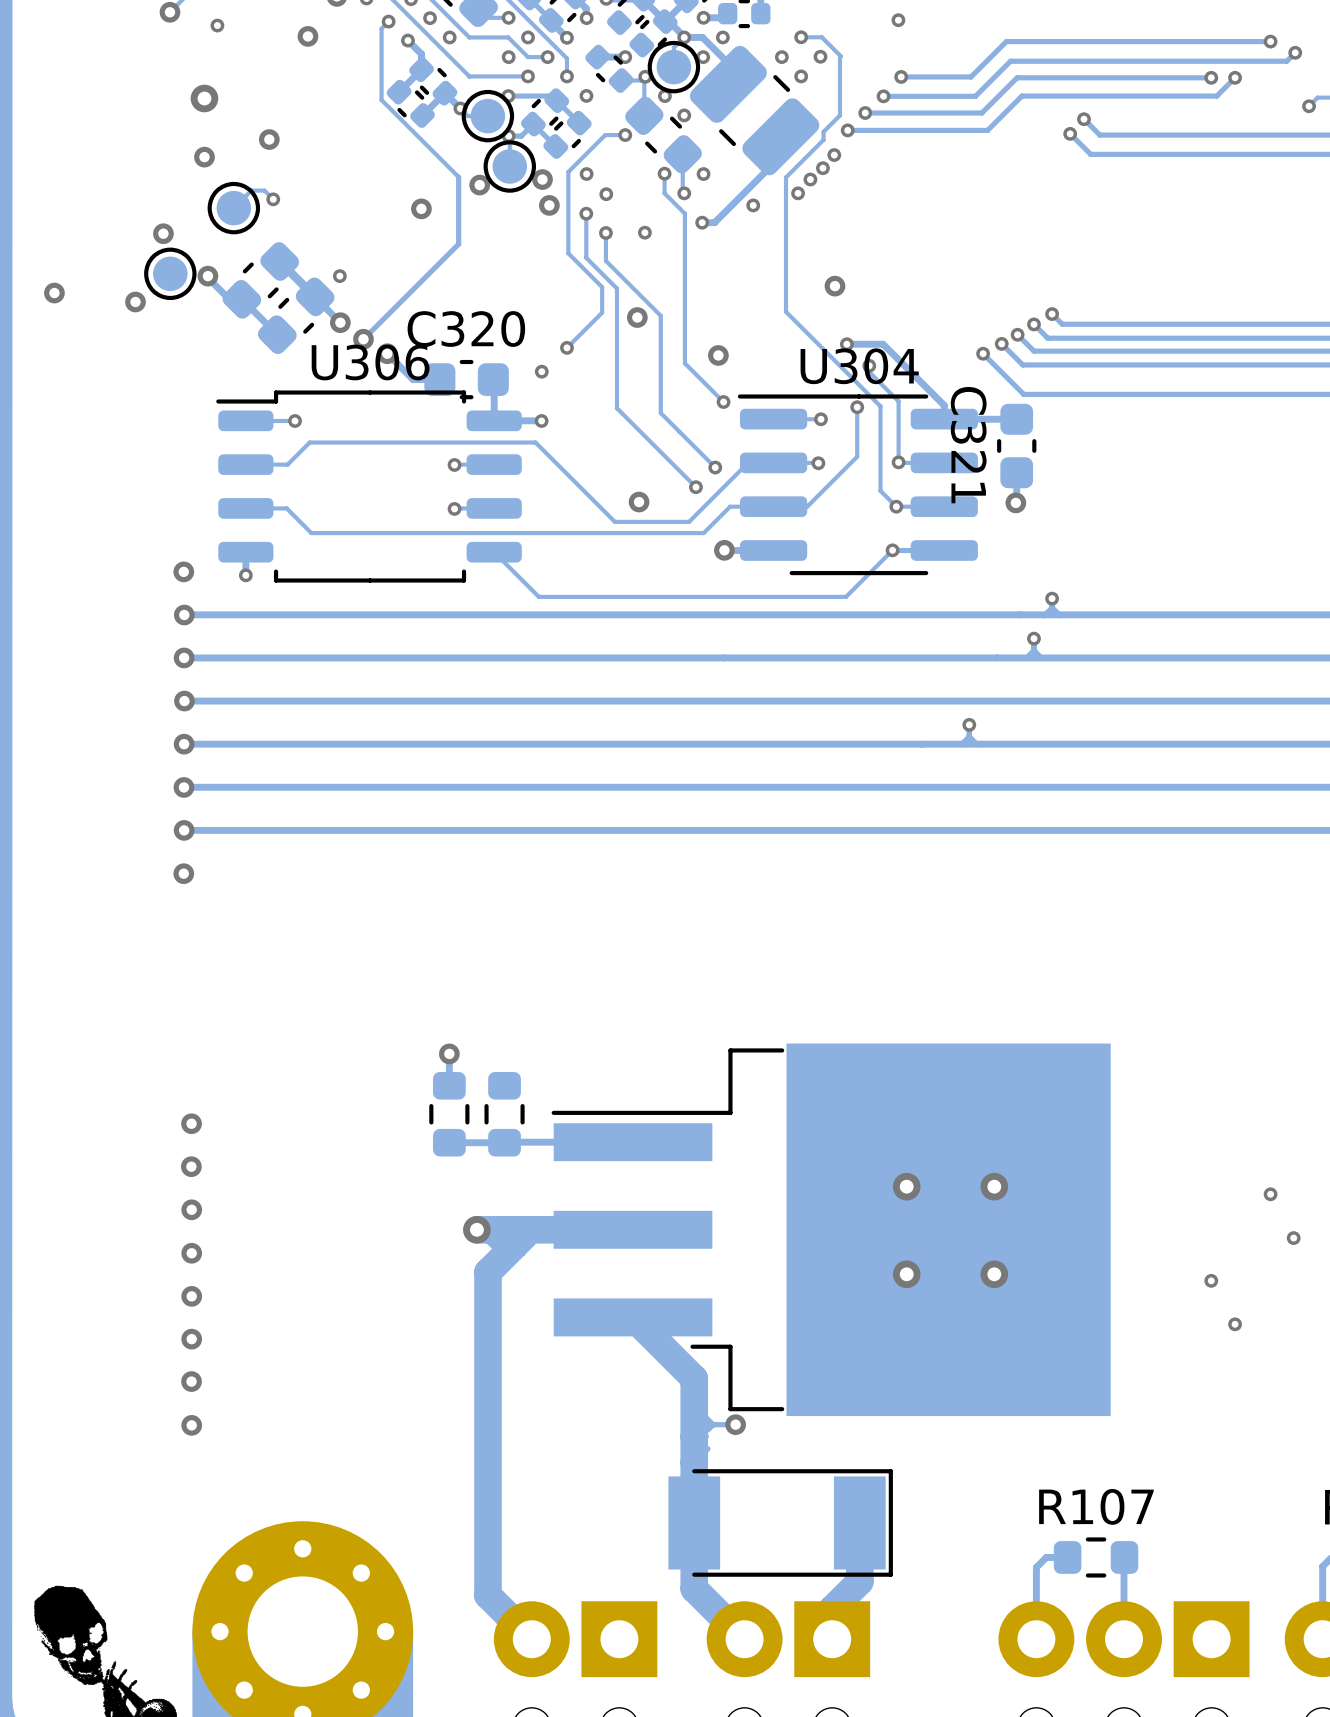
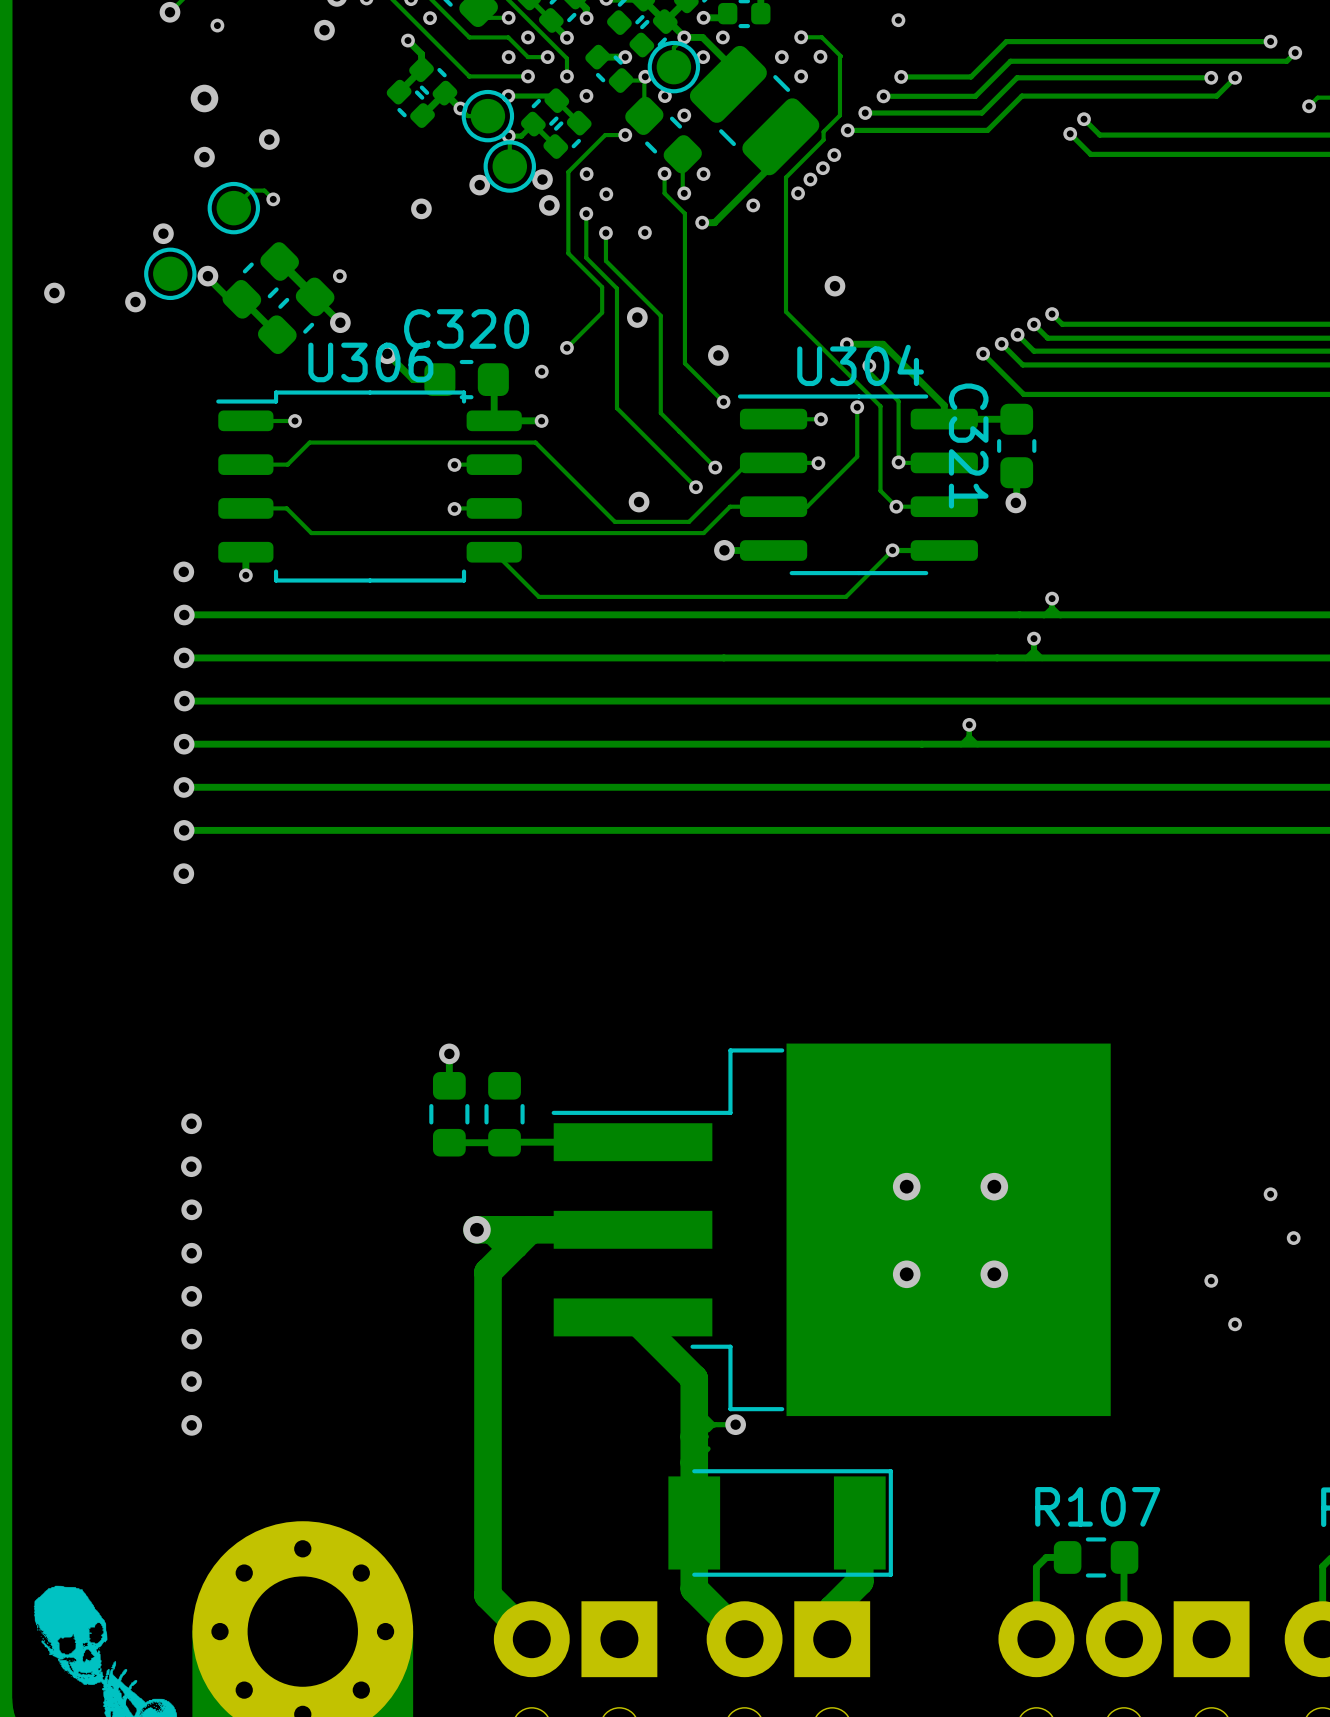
track: (388, 21) (381, 28) (381, 100) (458, 177) (458, 244) (363, 339) -> none
via: (388, 21) -> none
via position: (307, 36) -> (324, 30)
via: (449, 37) -> none
via: (363, 339) -> none

